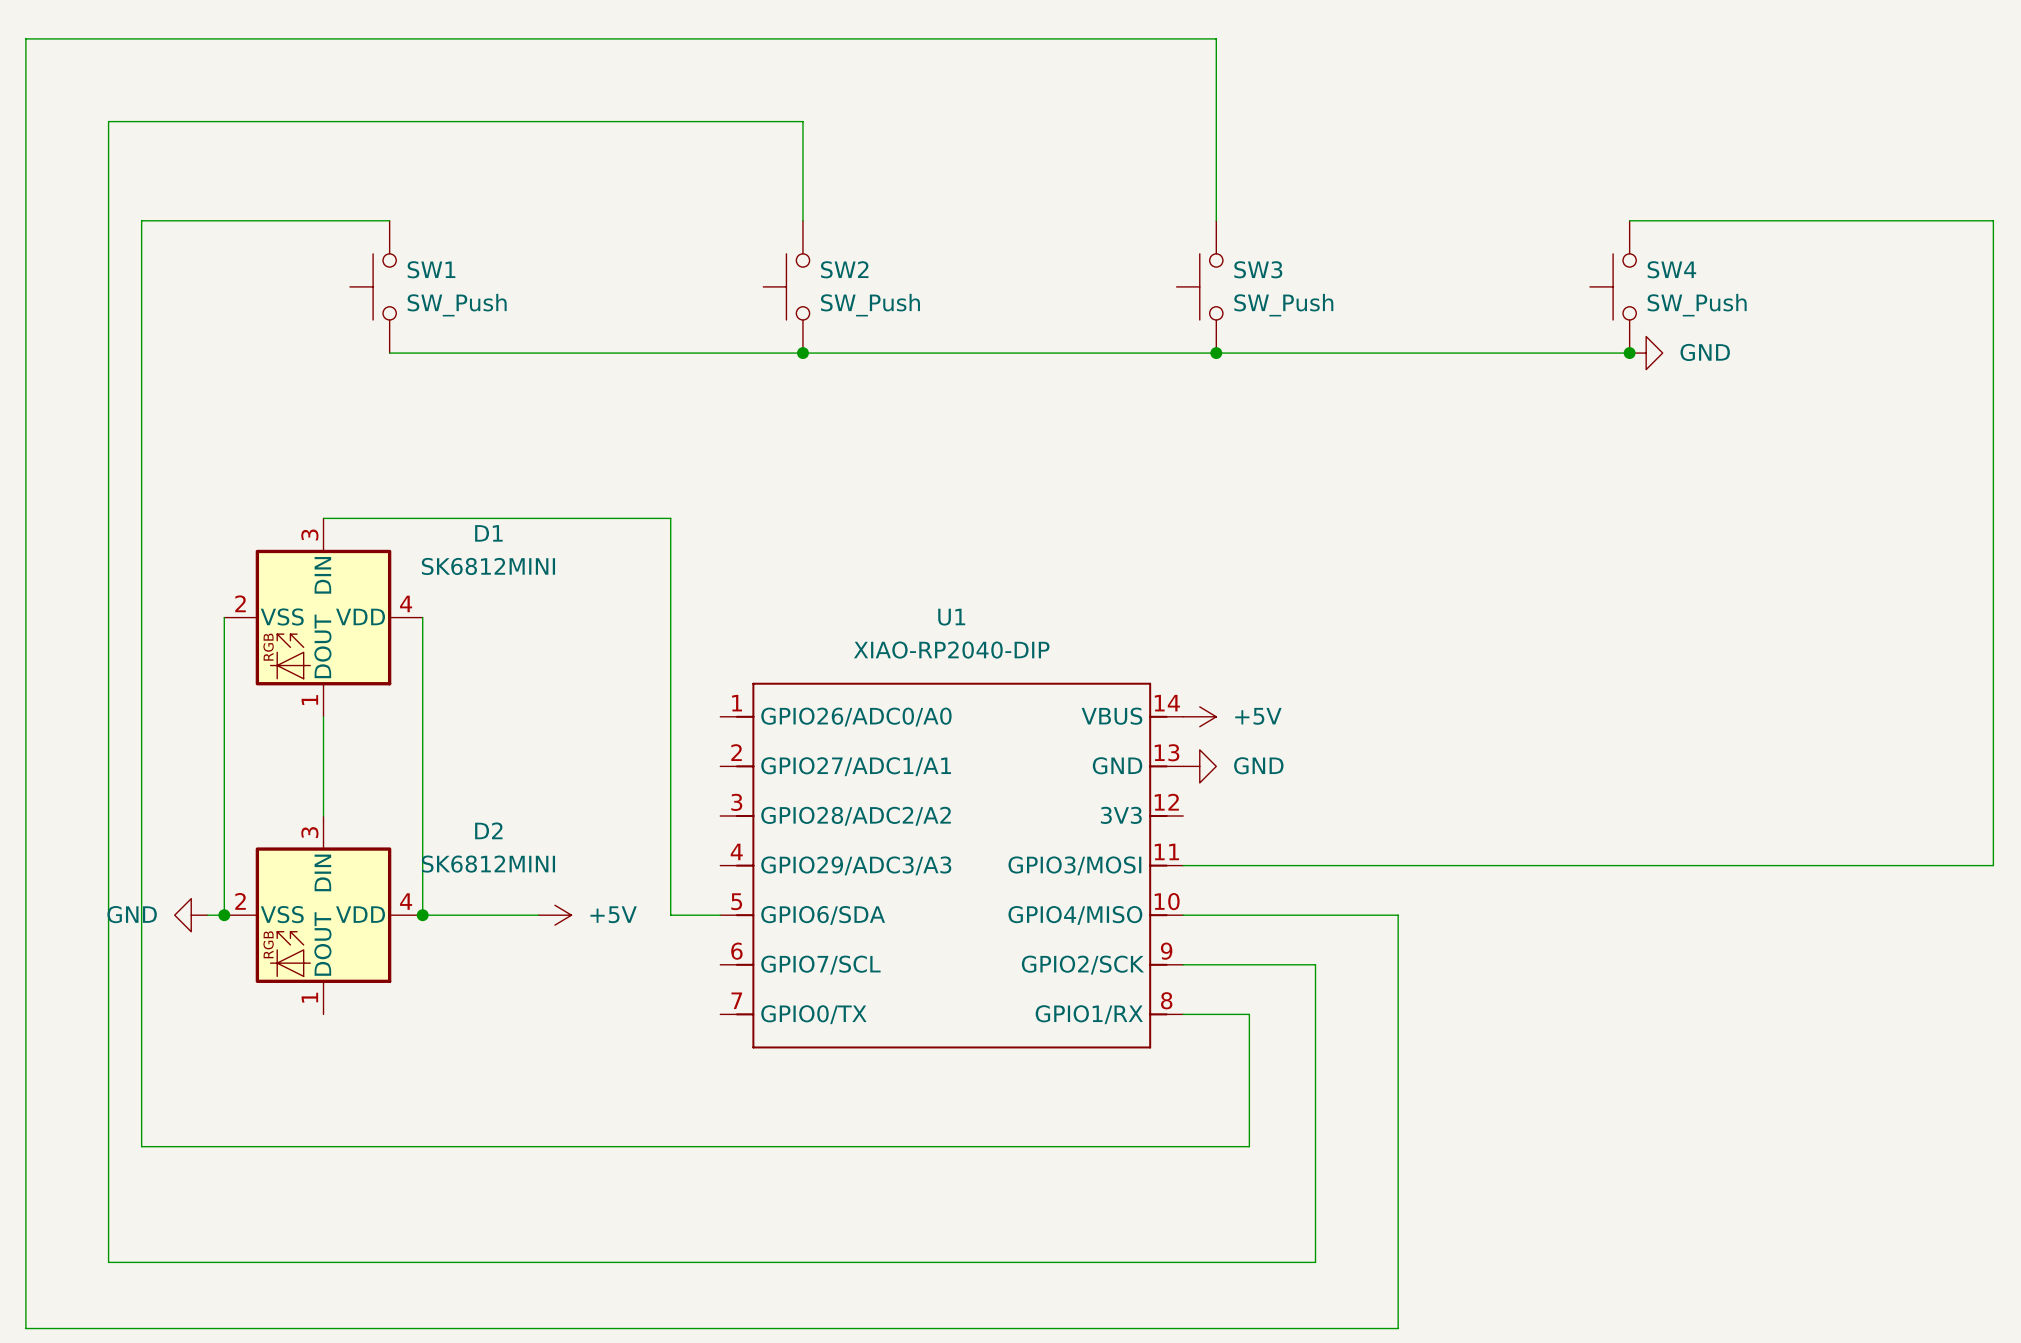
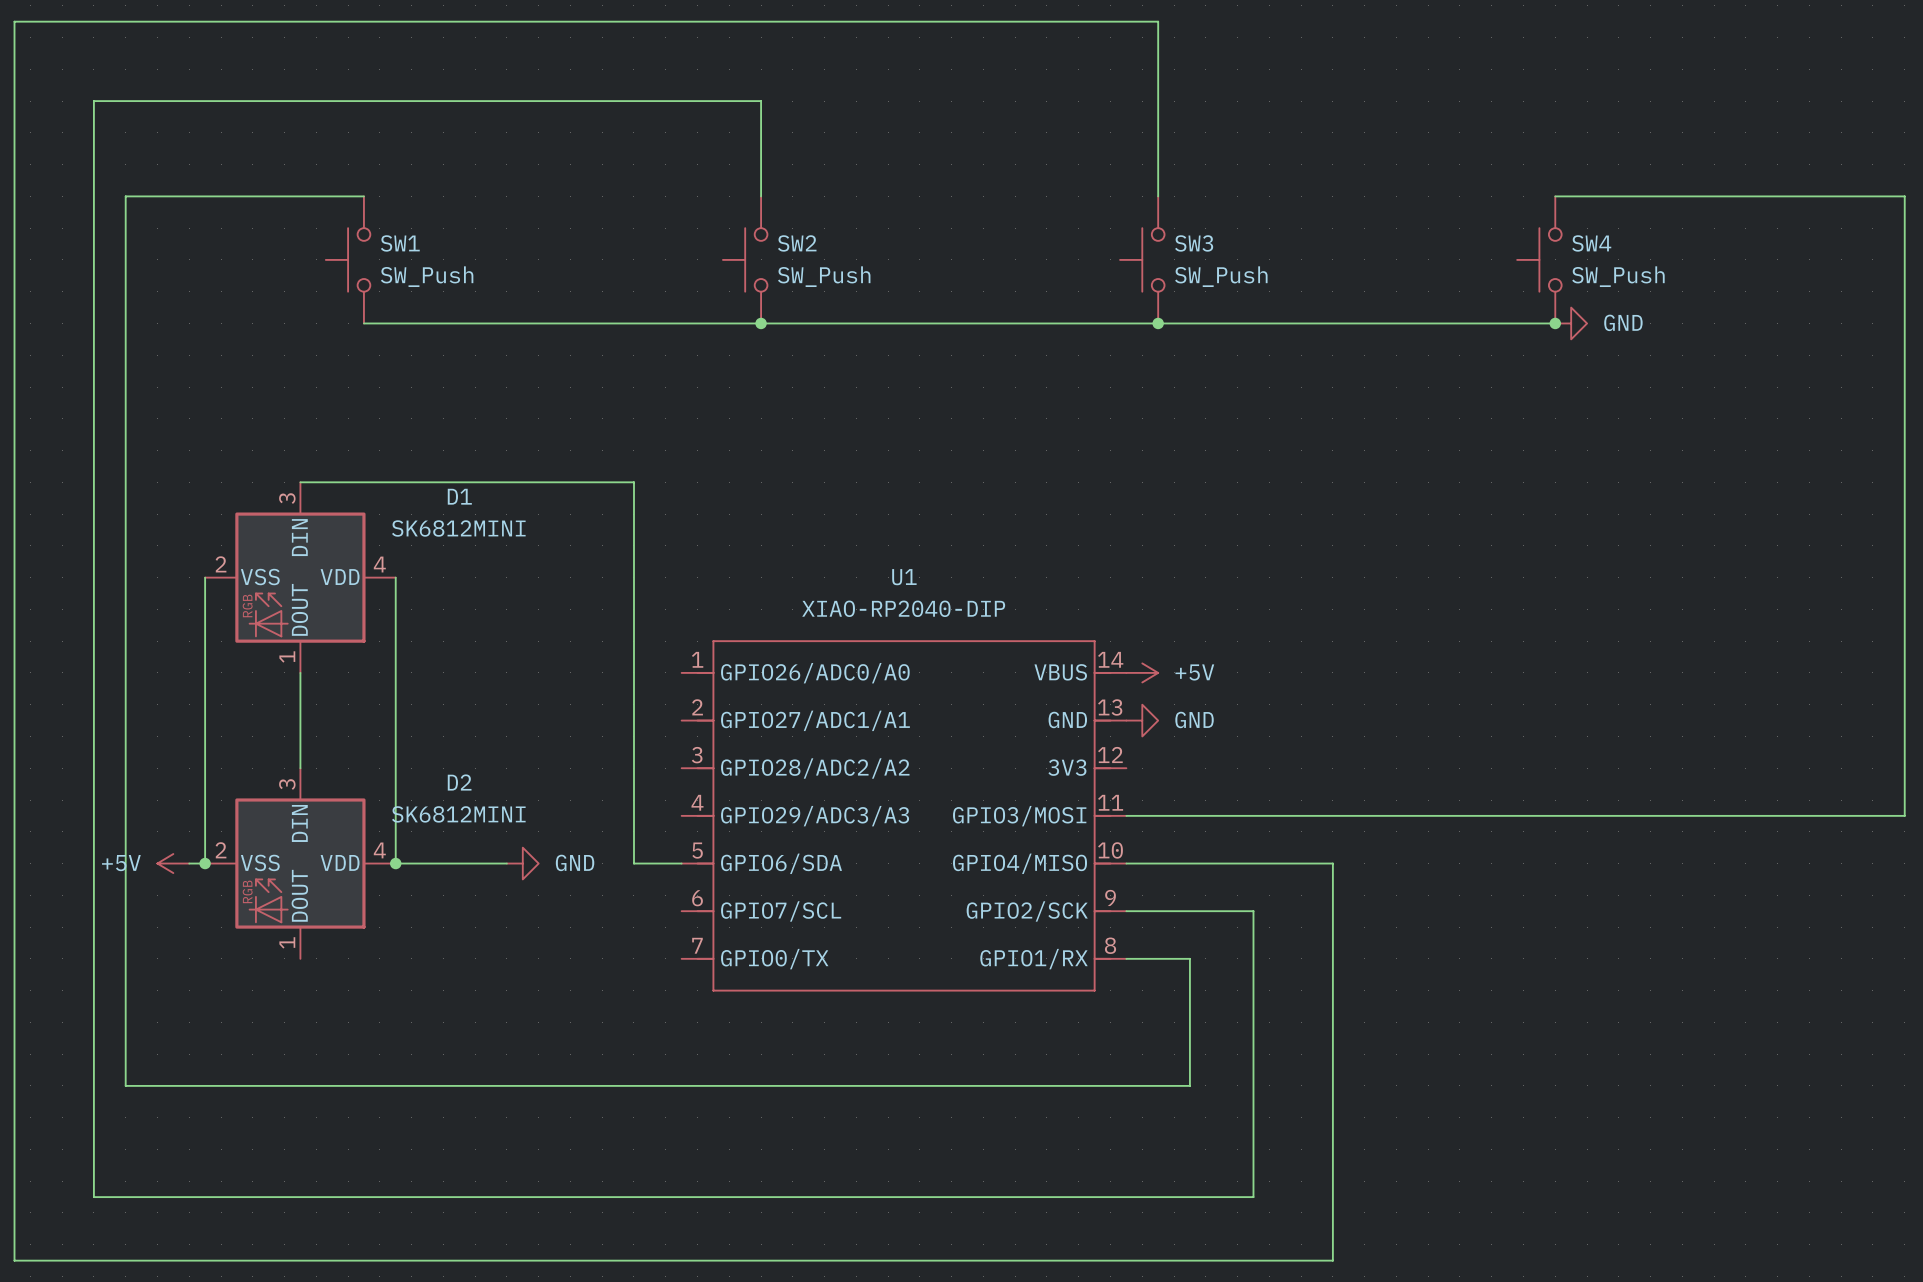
power symbol: GND (191, 915) -> +5V (173, 863)
power symbol: +5V (554, 915) -> GND (522, 863)

